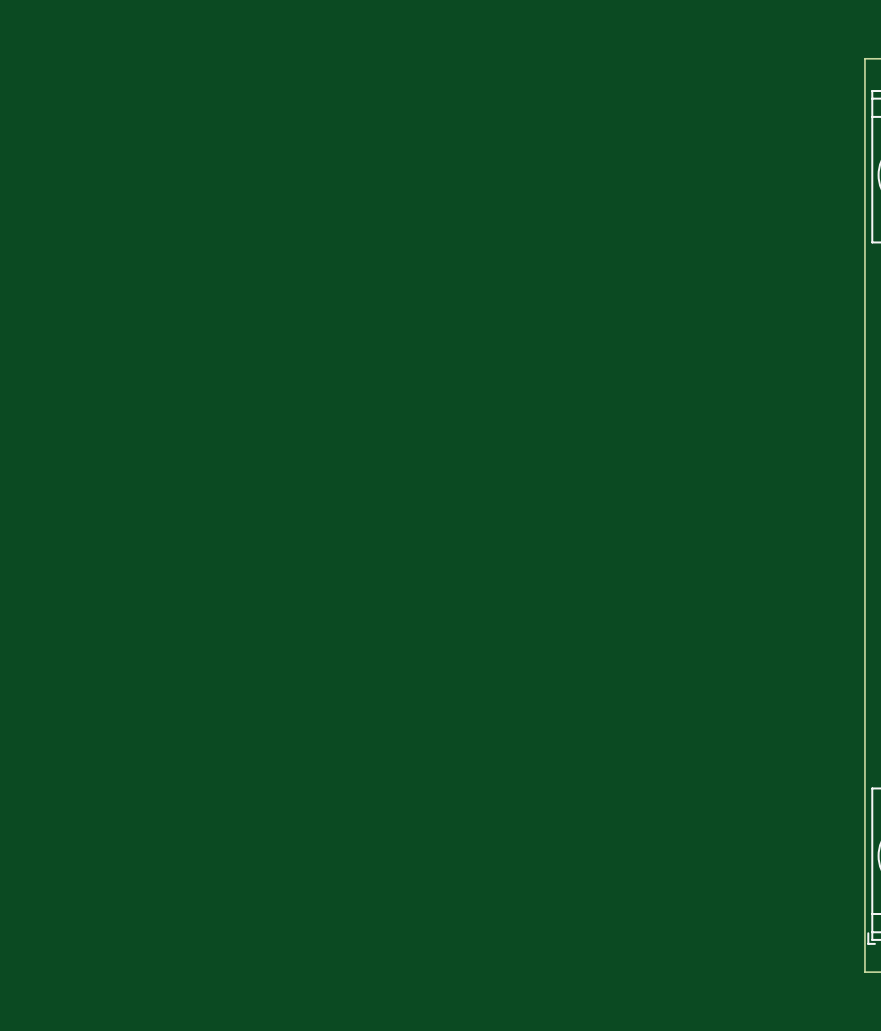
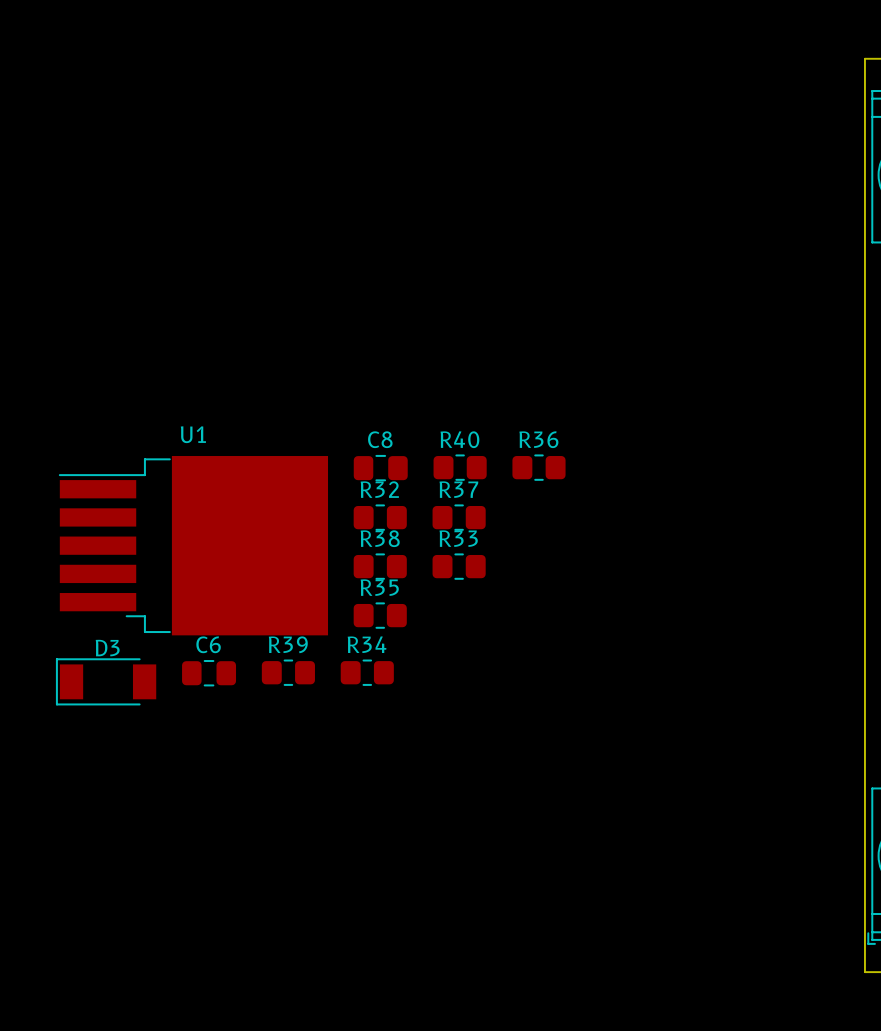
R40: none -> (460, 467)
R36: none -> (538, 467)
C8: none -> (380, 468)
R32: none -> (380, 517)
R37: none -> (459, 517)
U1: none -> (193, 545)
R38: none -> (380, 566)
R33: none -> (459, 566)
R35: none -> (380, 615)
R39: none -> (288, 672)
R34: none -> (367, 672)
C6: none -> (209, 673)
D3: none -> (106, 681)

